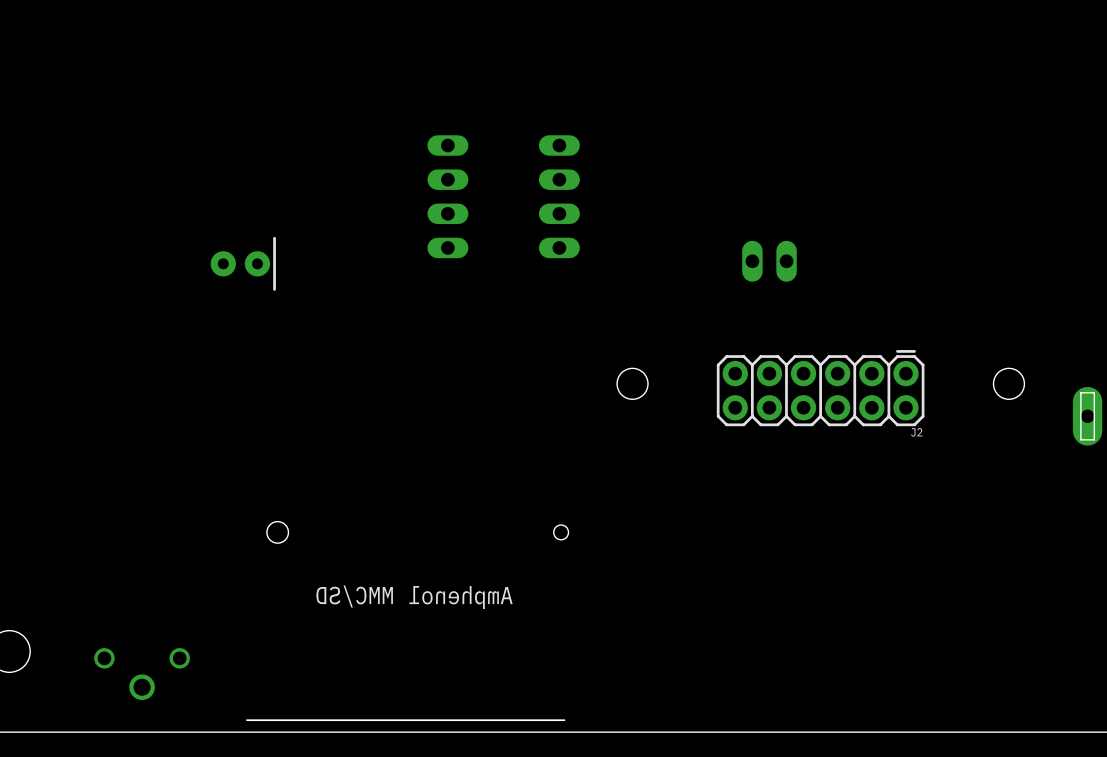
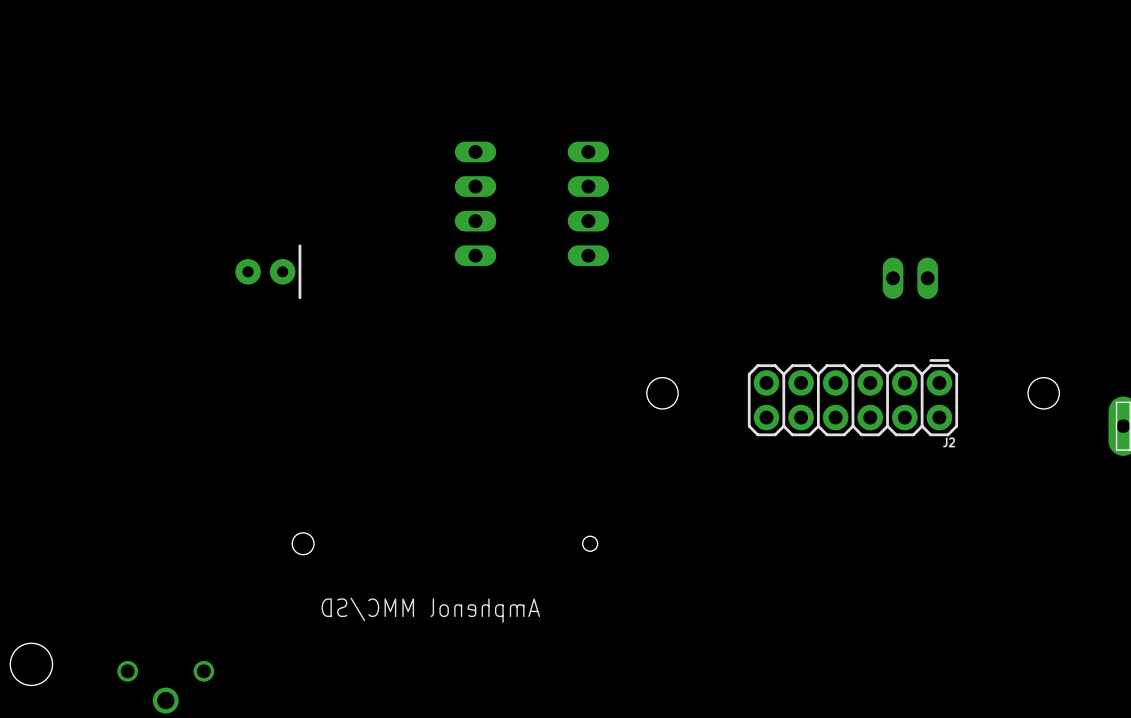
part position: (769, 261) -> (910, 278)

